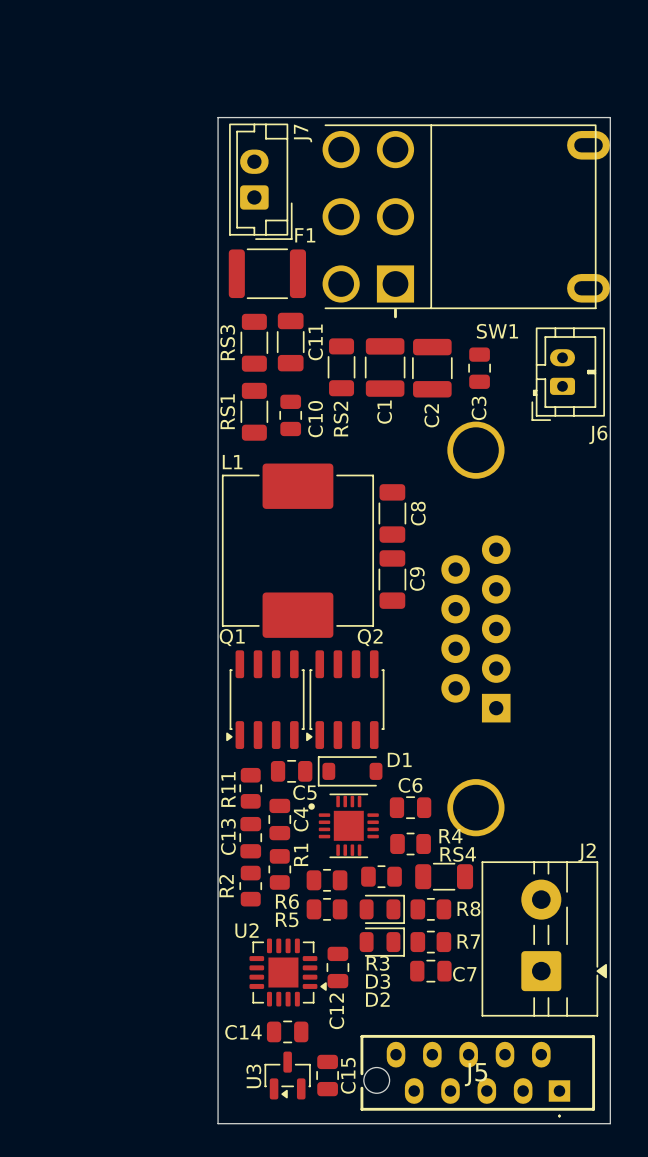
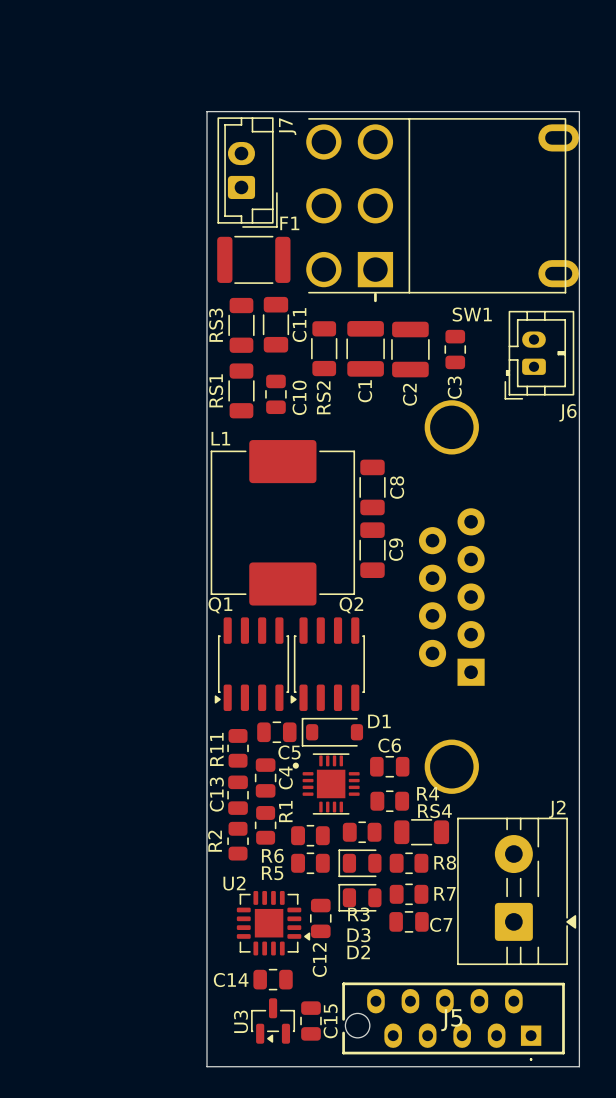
D3 rotation: 0° (382, 909) -> 180° (359, 863)
D2 rotation: 0° (382, 942) -> 180° (359, 897)

